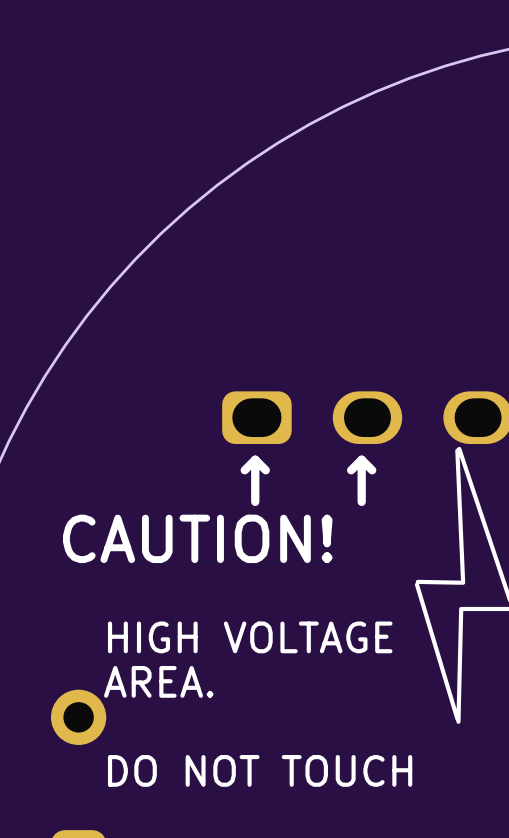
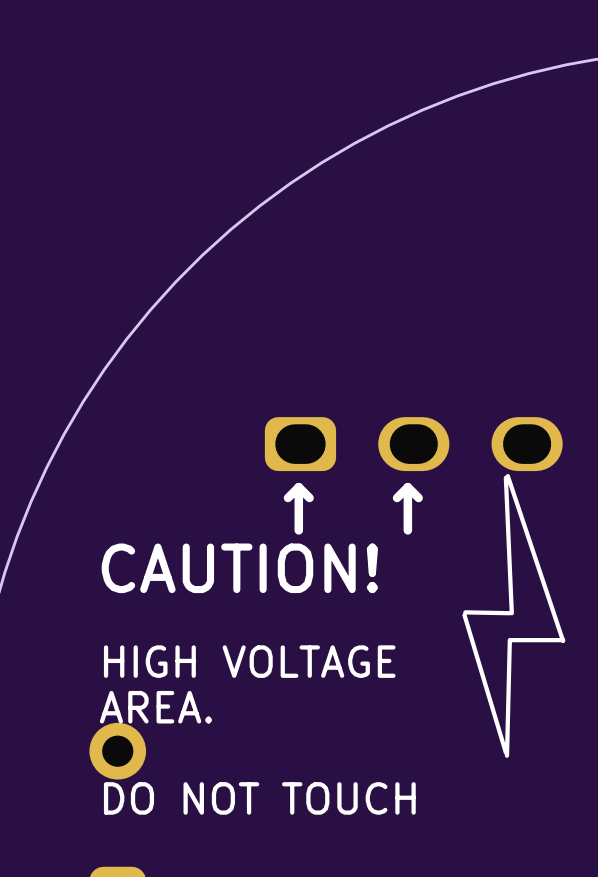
text position: HIGH VOLTAGE (250, 637) -> HIGH VOLTAGE (249, 661)
text position: AREA. (158, 681) -> AREA. (155, 707)
text position: DO NOT TOUCH (260, 770) -> DO NOT TOUCH (259, 798)

